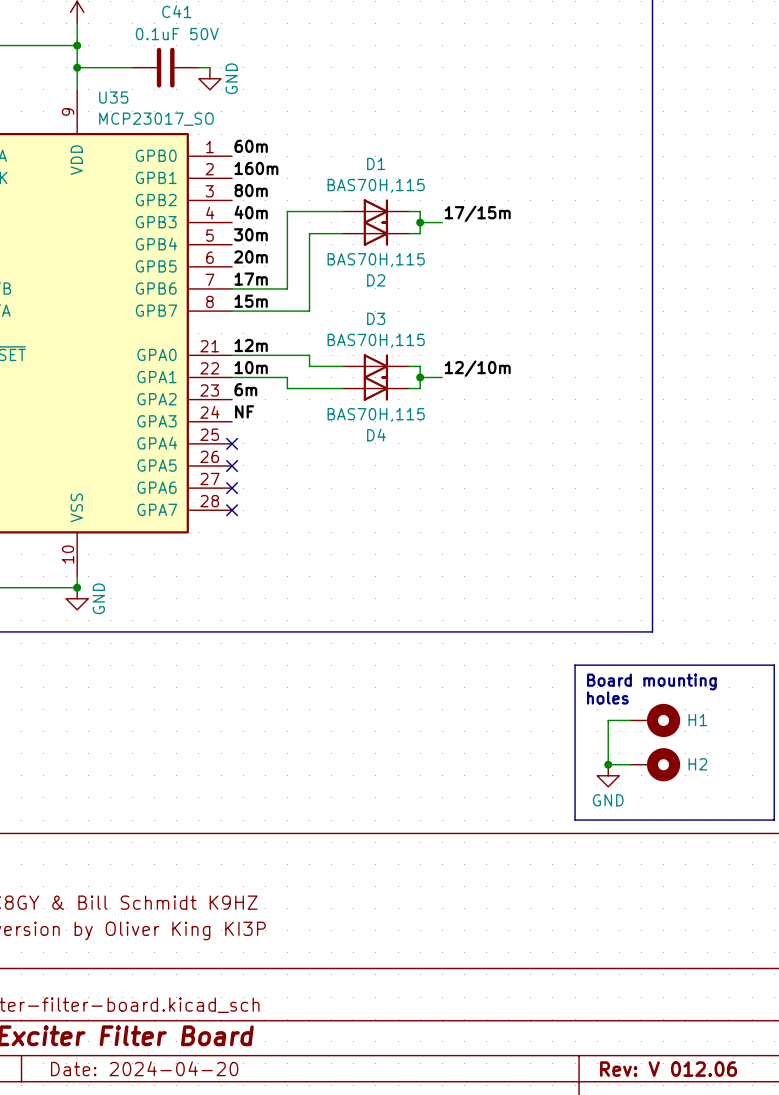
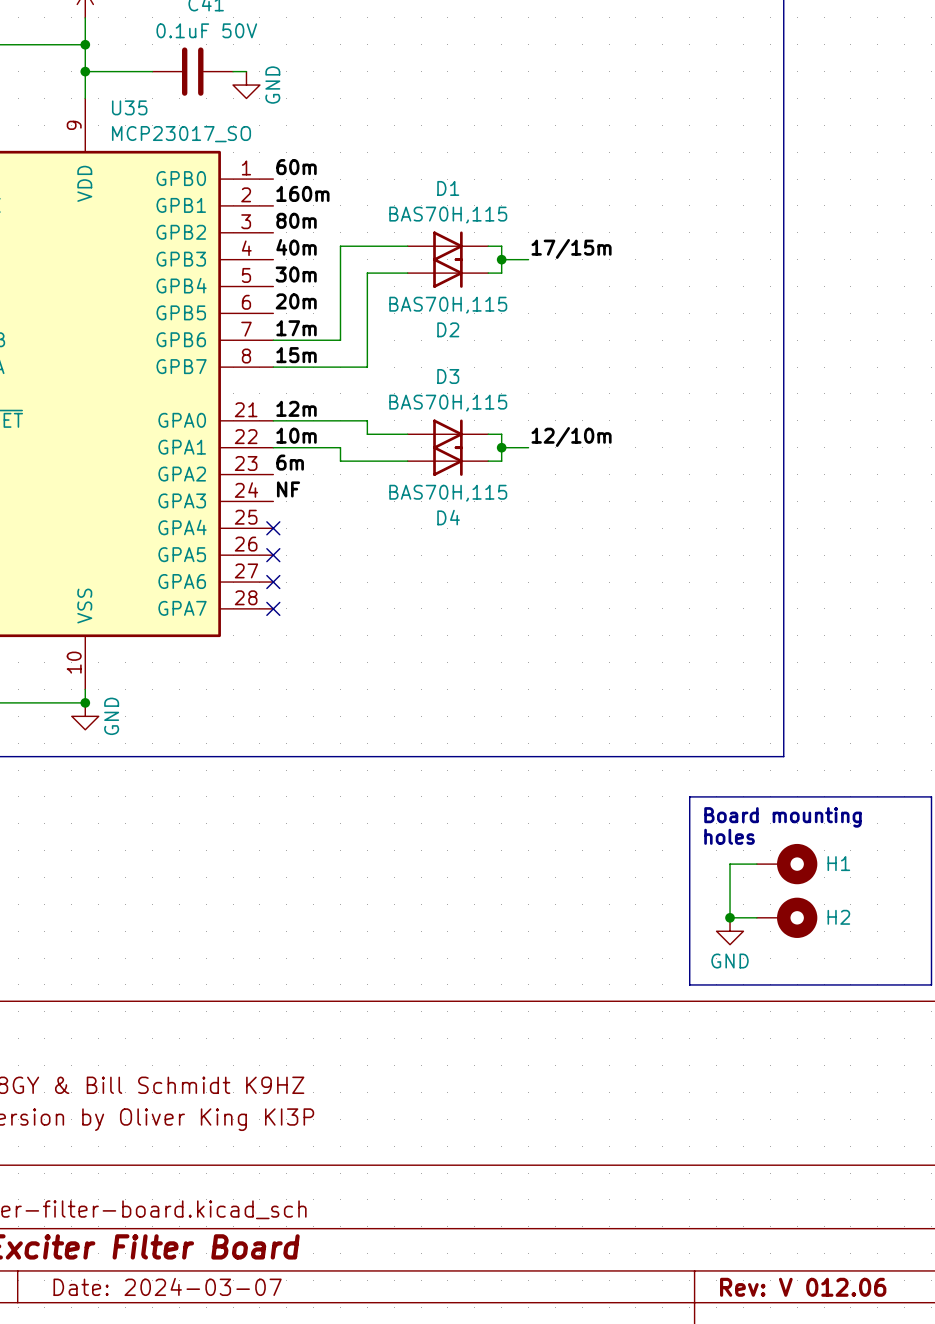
title block: Date: 2024-04-20 (144, 1068) -> Date: 2024-03-07 (167, 1286)

